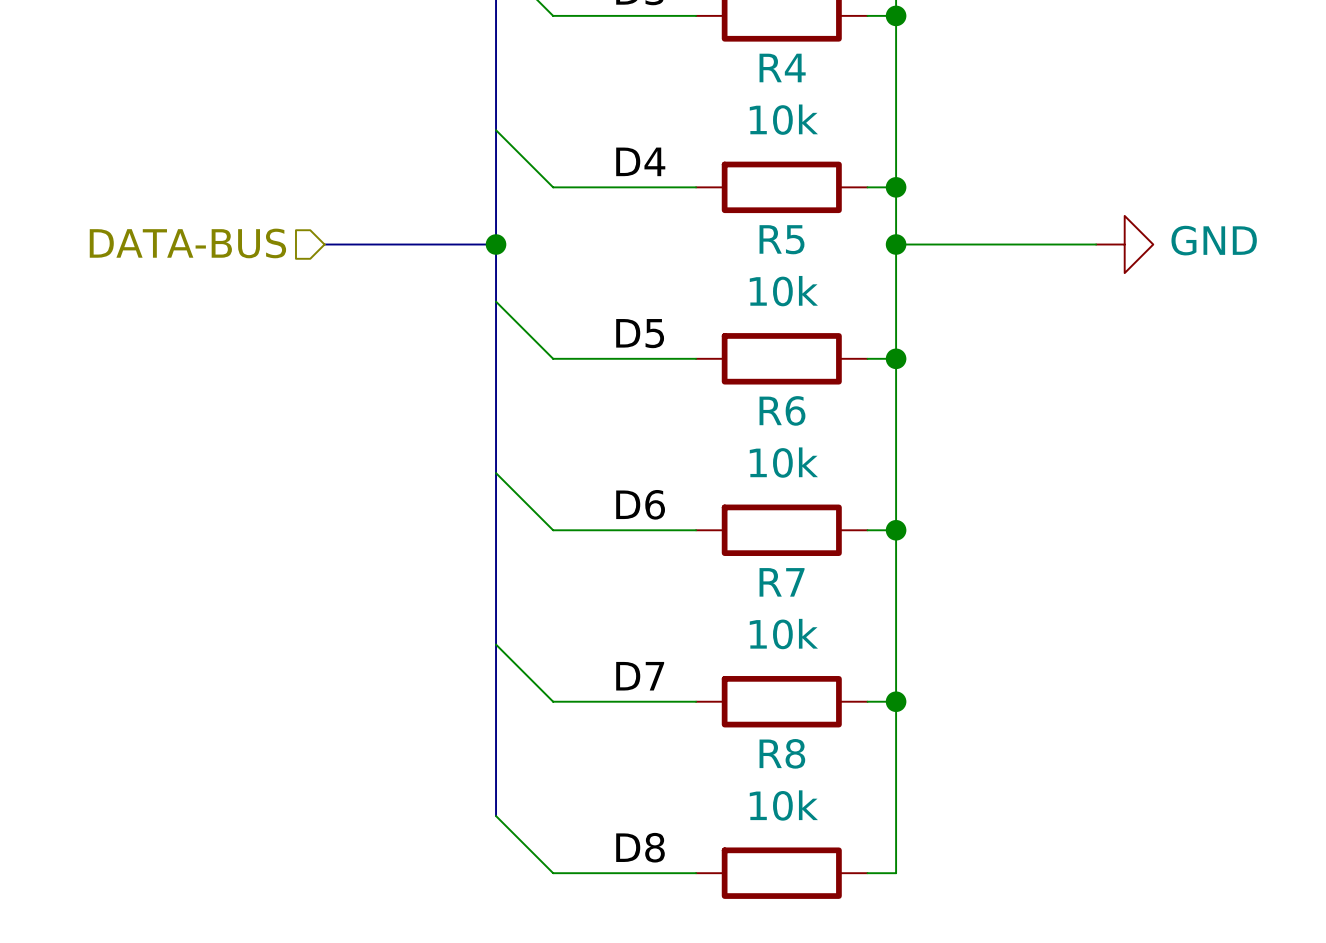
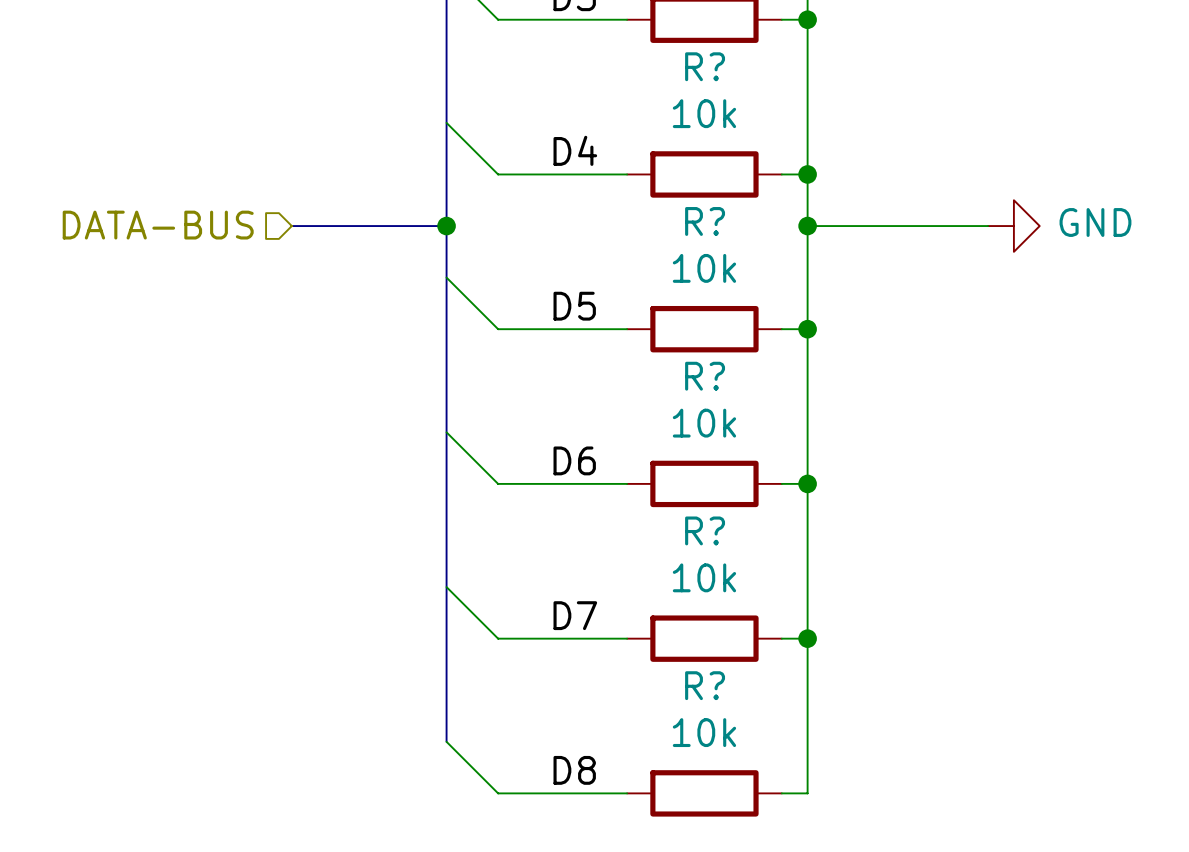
R4 name: R4 (782, 67) -> R? (705, 66)
R5 name: R5 (781, 239) -> R? (705, 221)
R6 name: R6 (782, 410) -> R? (705, 376)
R7 name: R7 (782, 582) -> R? (705, 530)
R8 name: R8 (782, 753) -> R? (705, 685)

